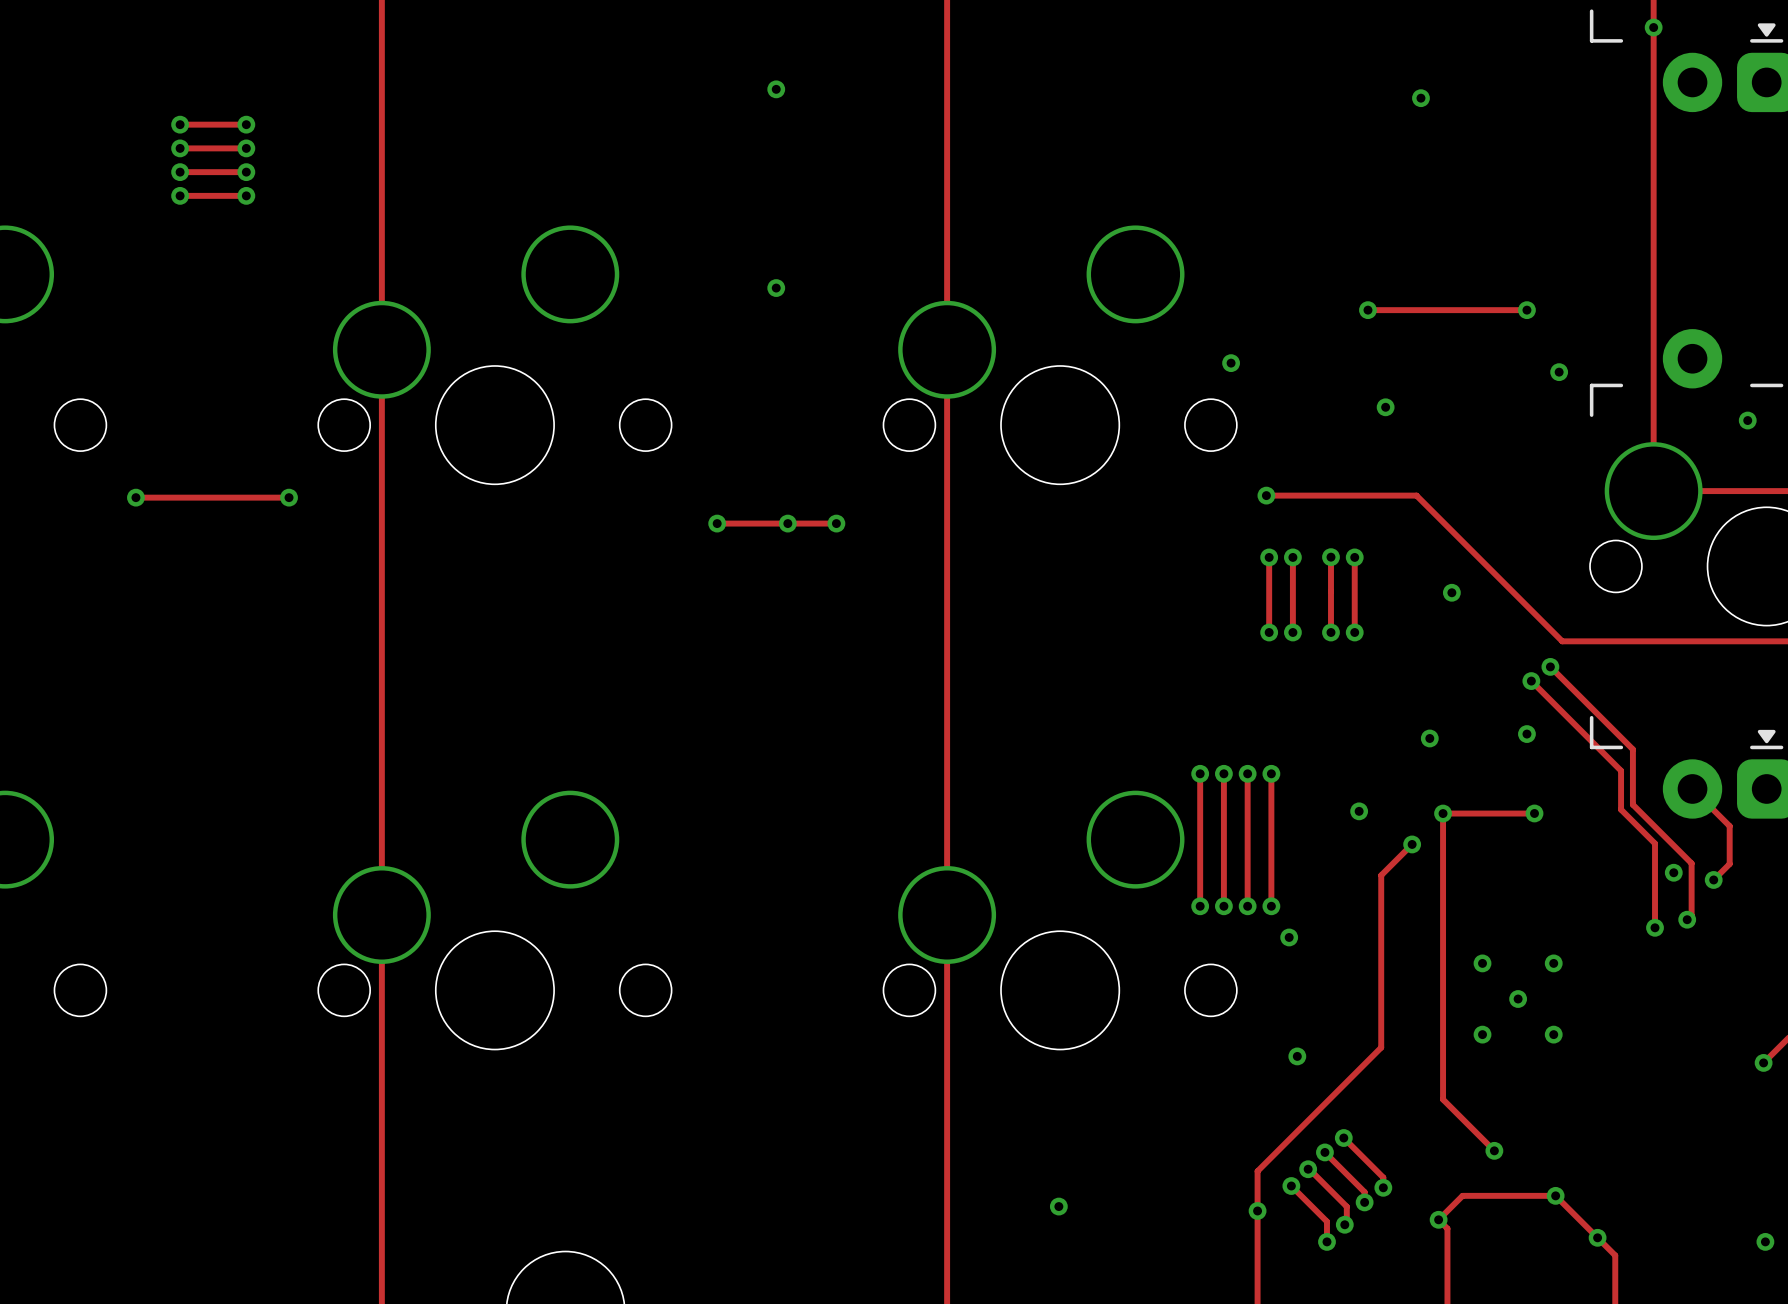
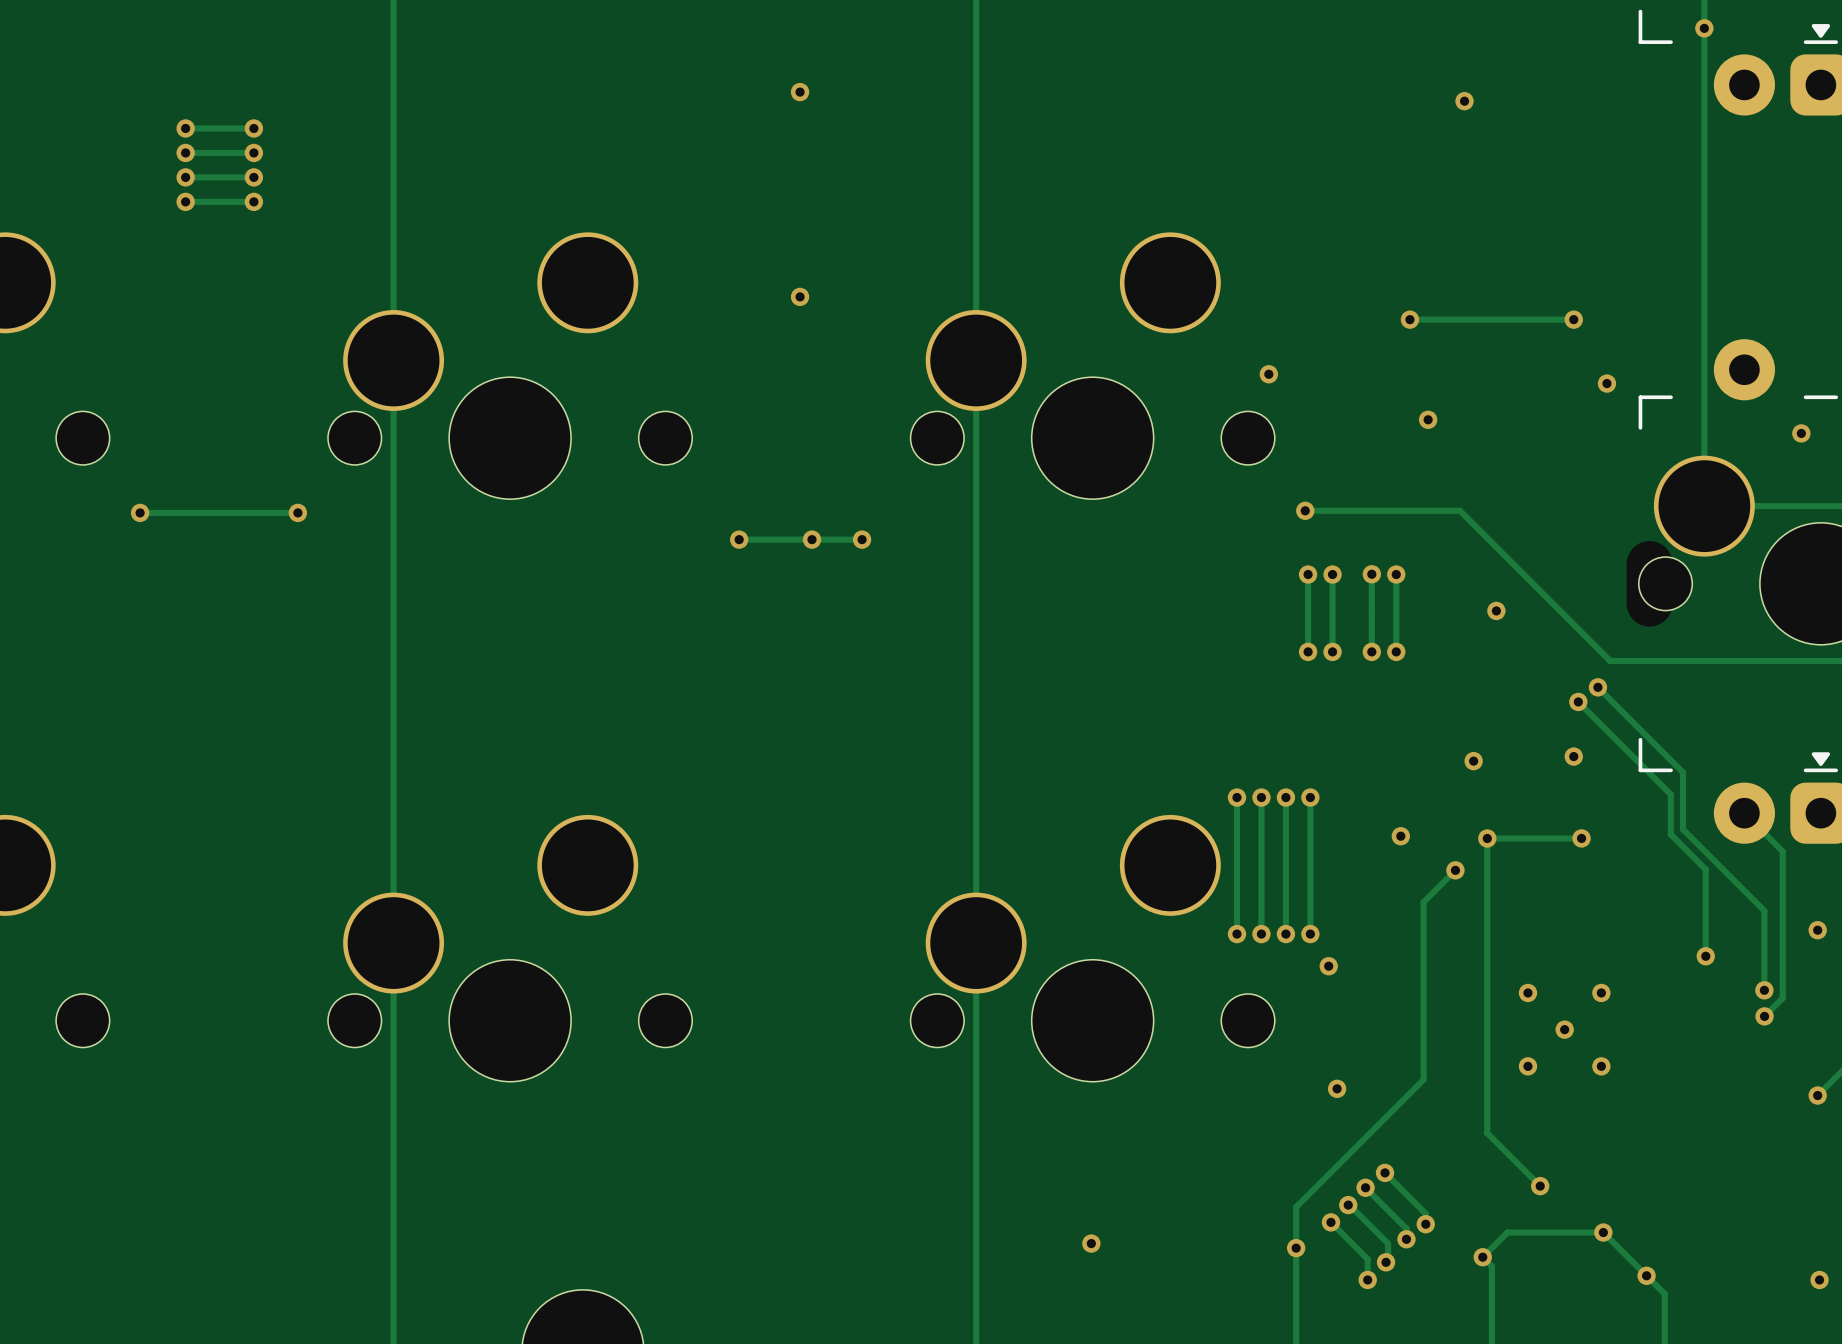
track: (1691, 863) (1691, 915) (1687, 919) -> (1743, 889) (1764, 910) (1764, 990)
track: (1729, 863) (1713, 879) -> (1782, 890) (1782, 998) (1764, 1016)
via: (1673, 872) -> none
via: (1713, 879) -> none
via: none -> (1817, 930)
via: (1687, 919) -> none
via: none -> (1764, 990)
via: none -> (1764, 1016)

